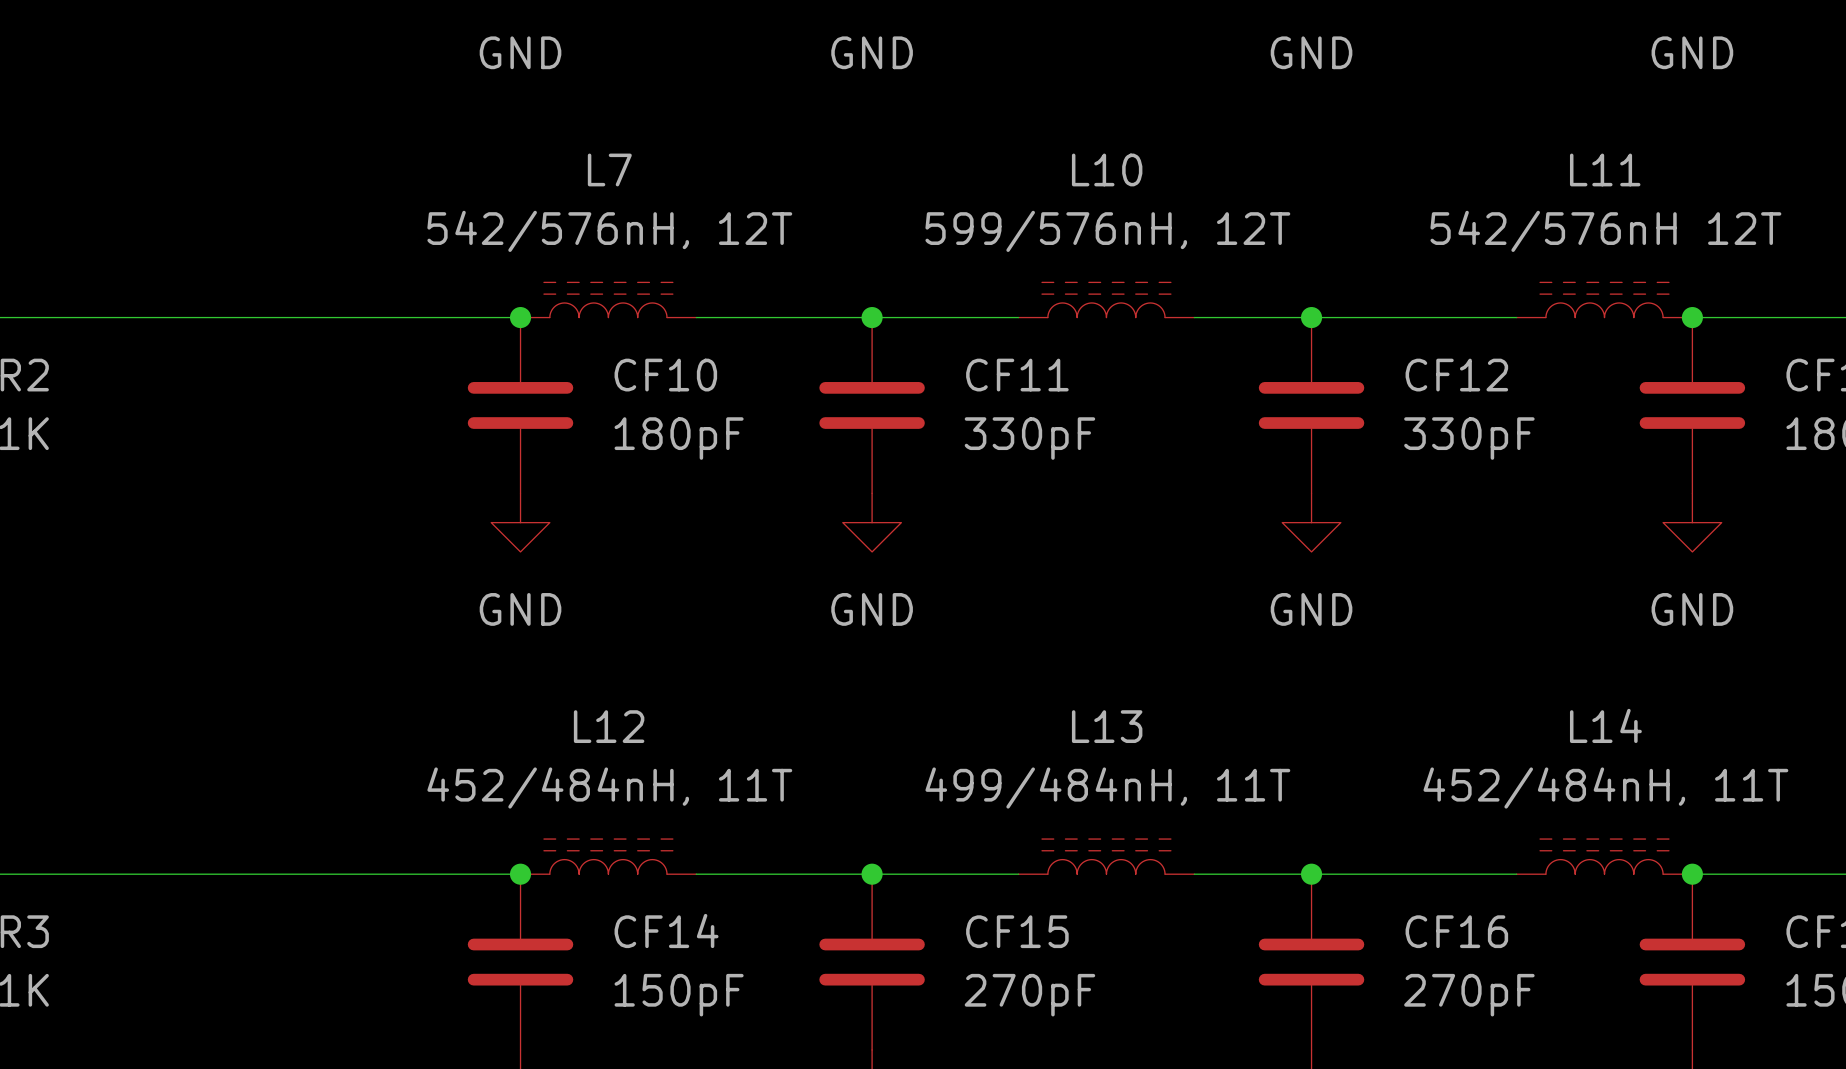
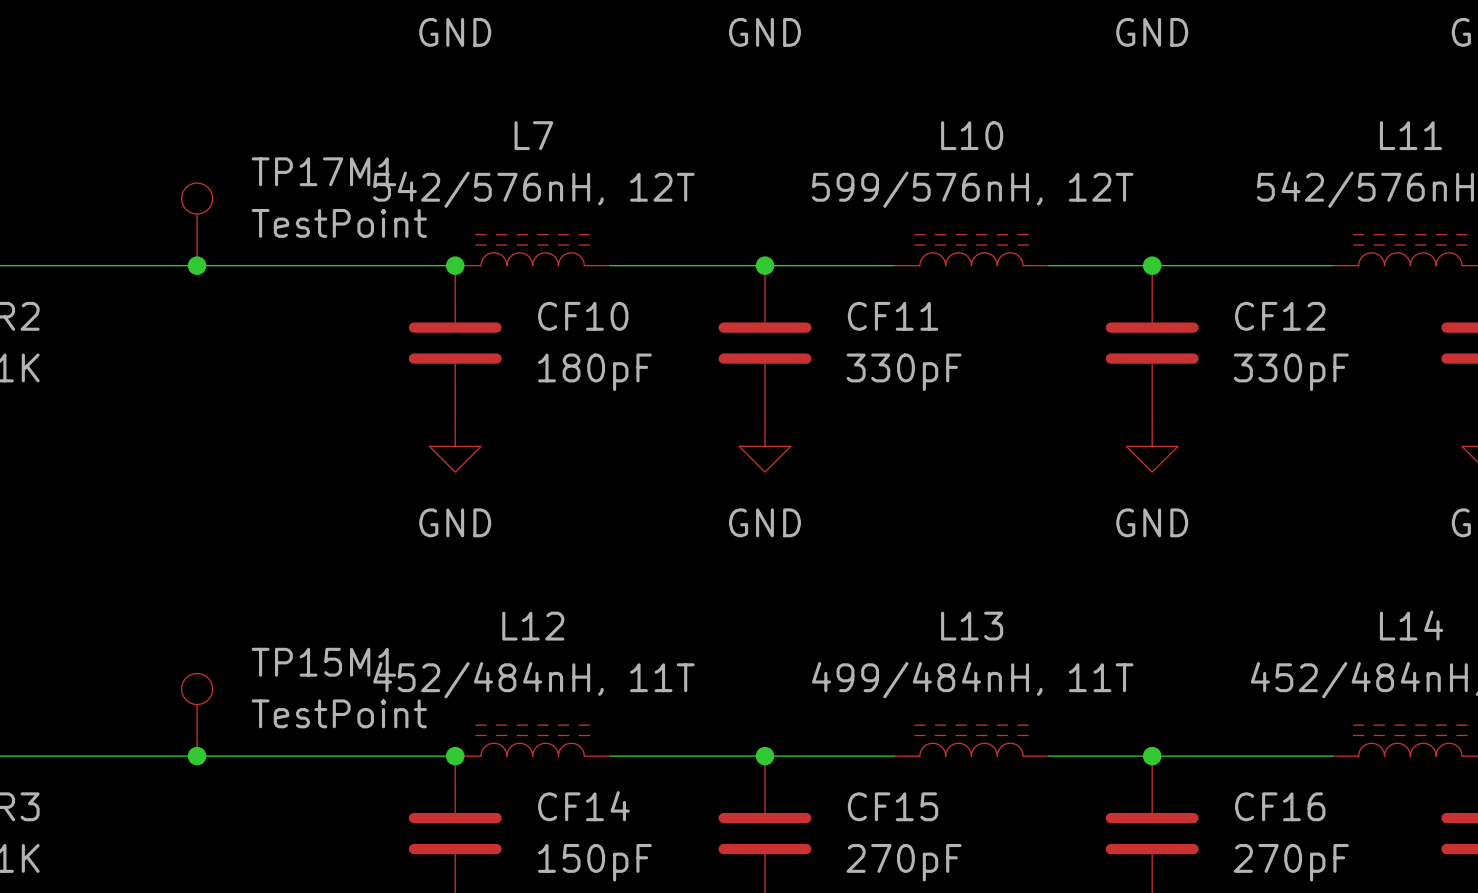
TP17M1: none -> TestPoint (197, 224)
junction: none -> (197, 265)
TP15M1: none -> TestPoint (197, 714)
junction: none -> (197, 756)

